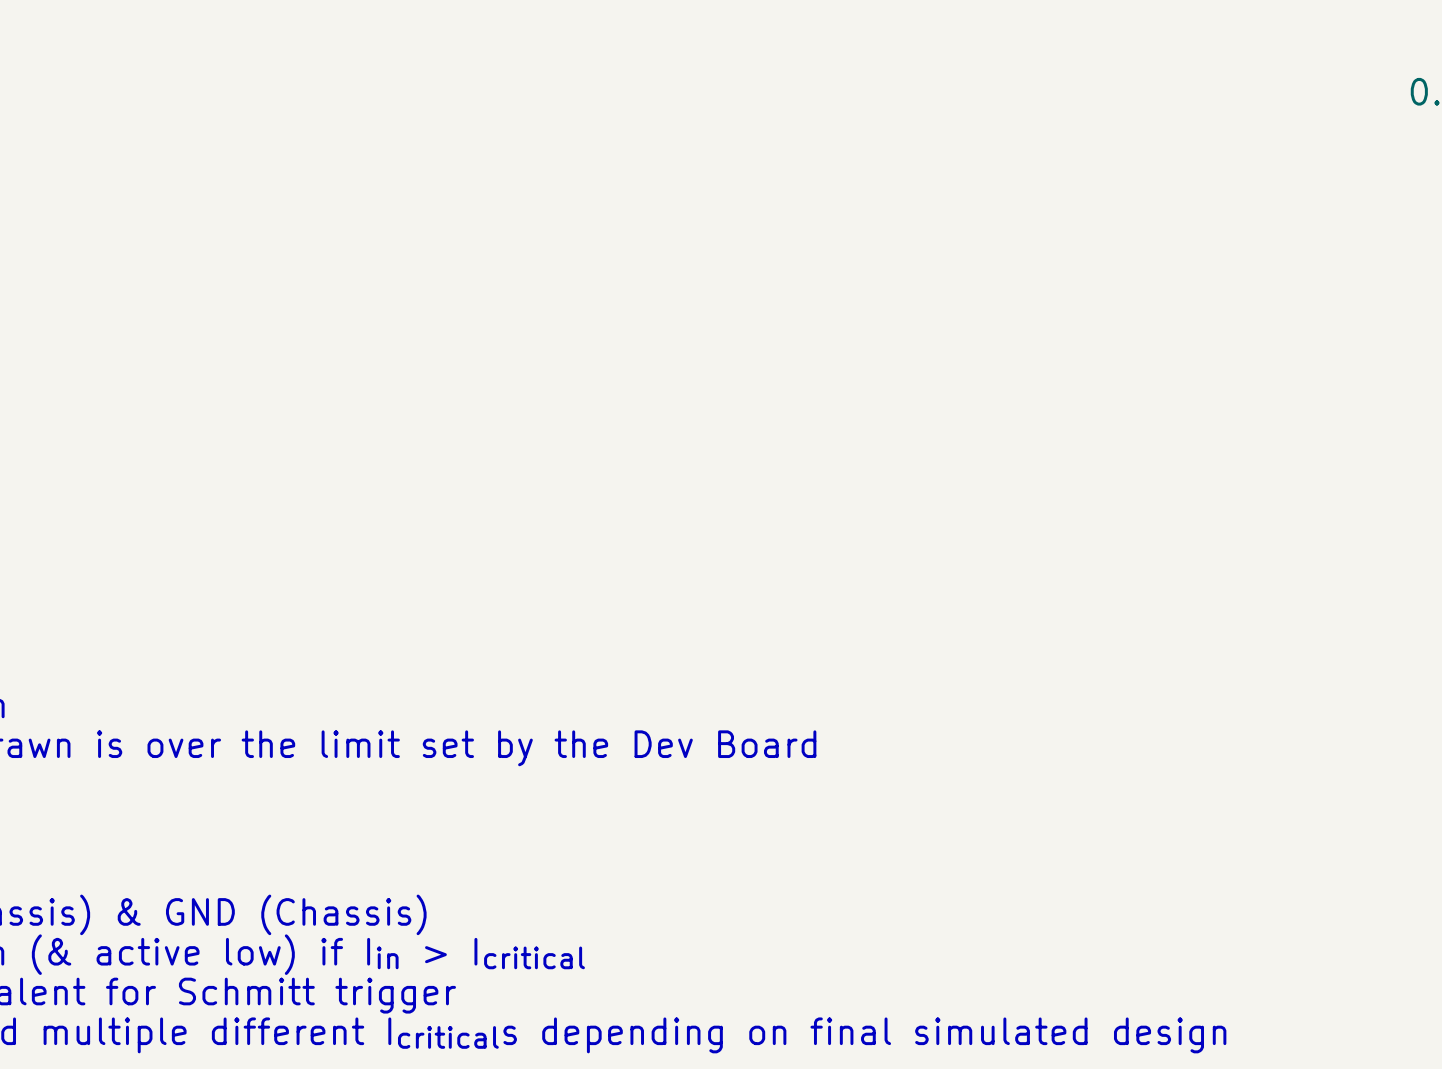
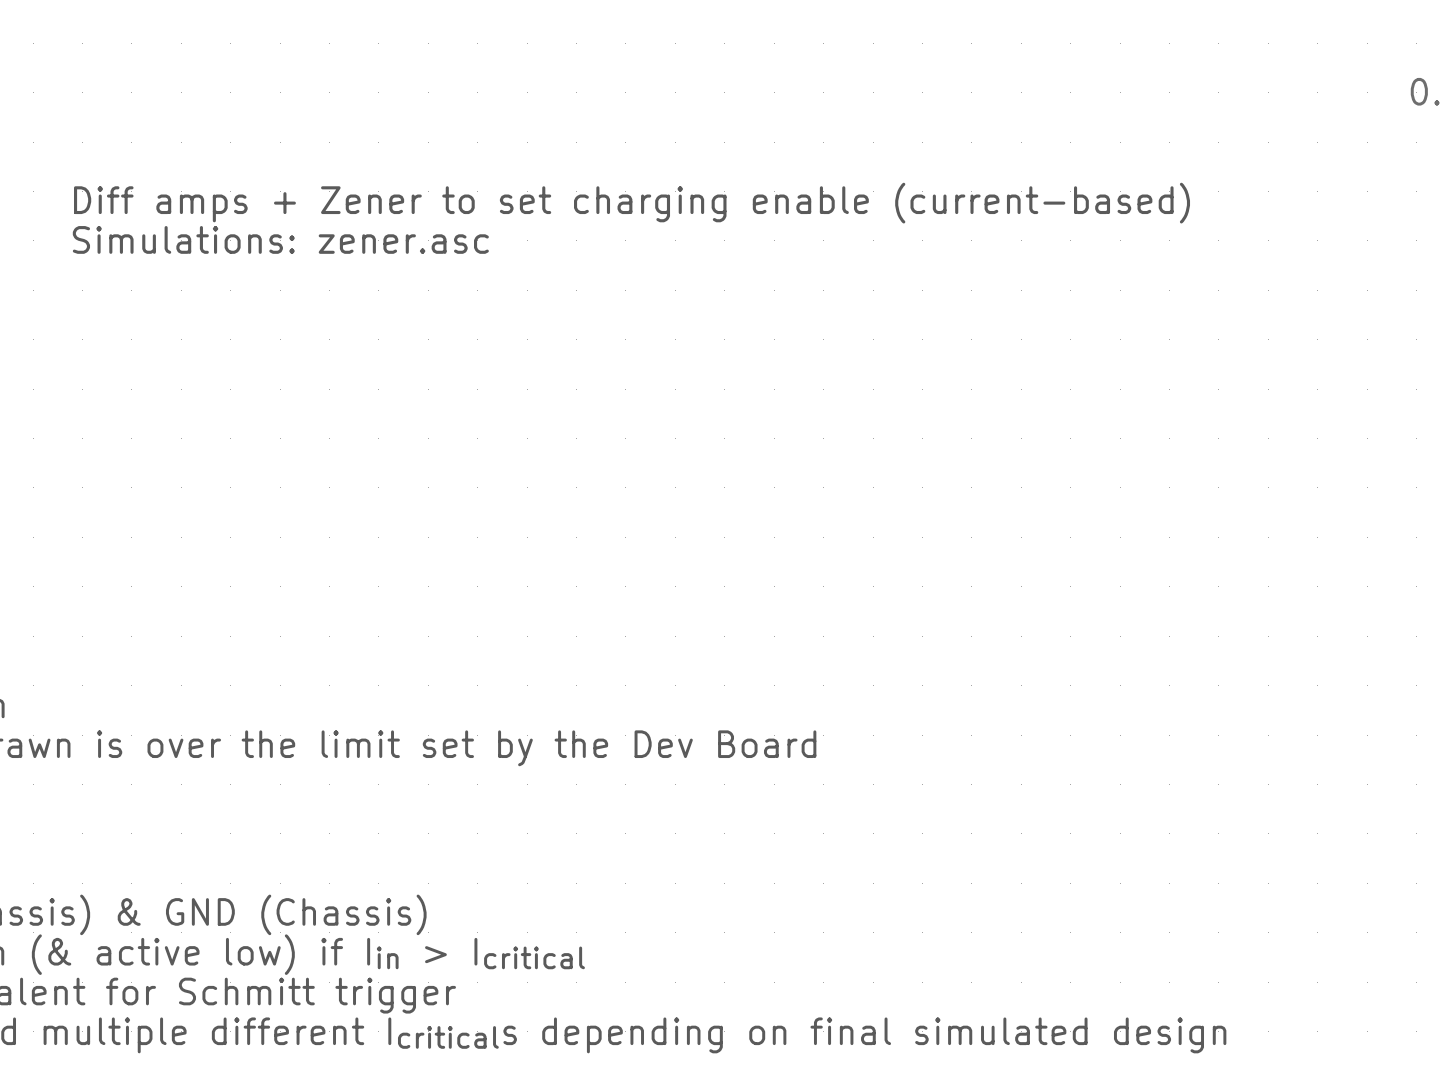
text: none -> Diff amps + Zener to set charging enable (current-based) (632, 203)
text: none -> Simulations: zener.asc (280, 239)

